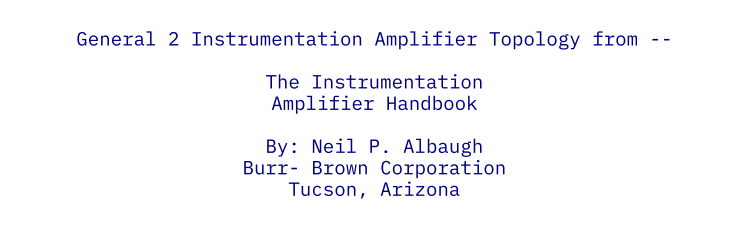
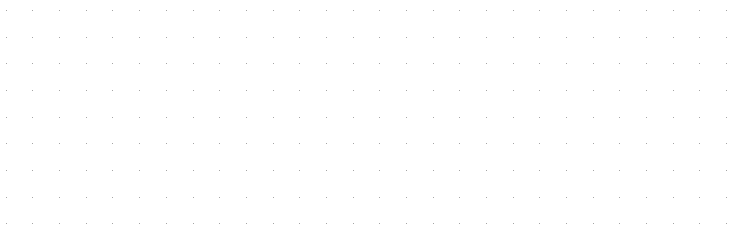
text: General 2 Instrumentation Amplifier Topology from -- (373, 40) -> none
text: The Instrumentation (373, 81) -> none
text: Amplifier Handbook (374, 104) -> none
text: By: Neil P. Albaugh (374, 147) -> none
text: Burr- Brown Corporation (374, 169) -> none
text: Tucson, Arizona (374, 190) -> none

